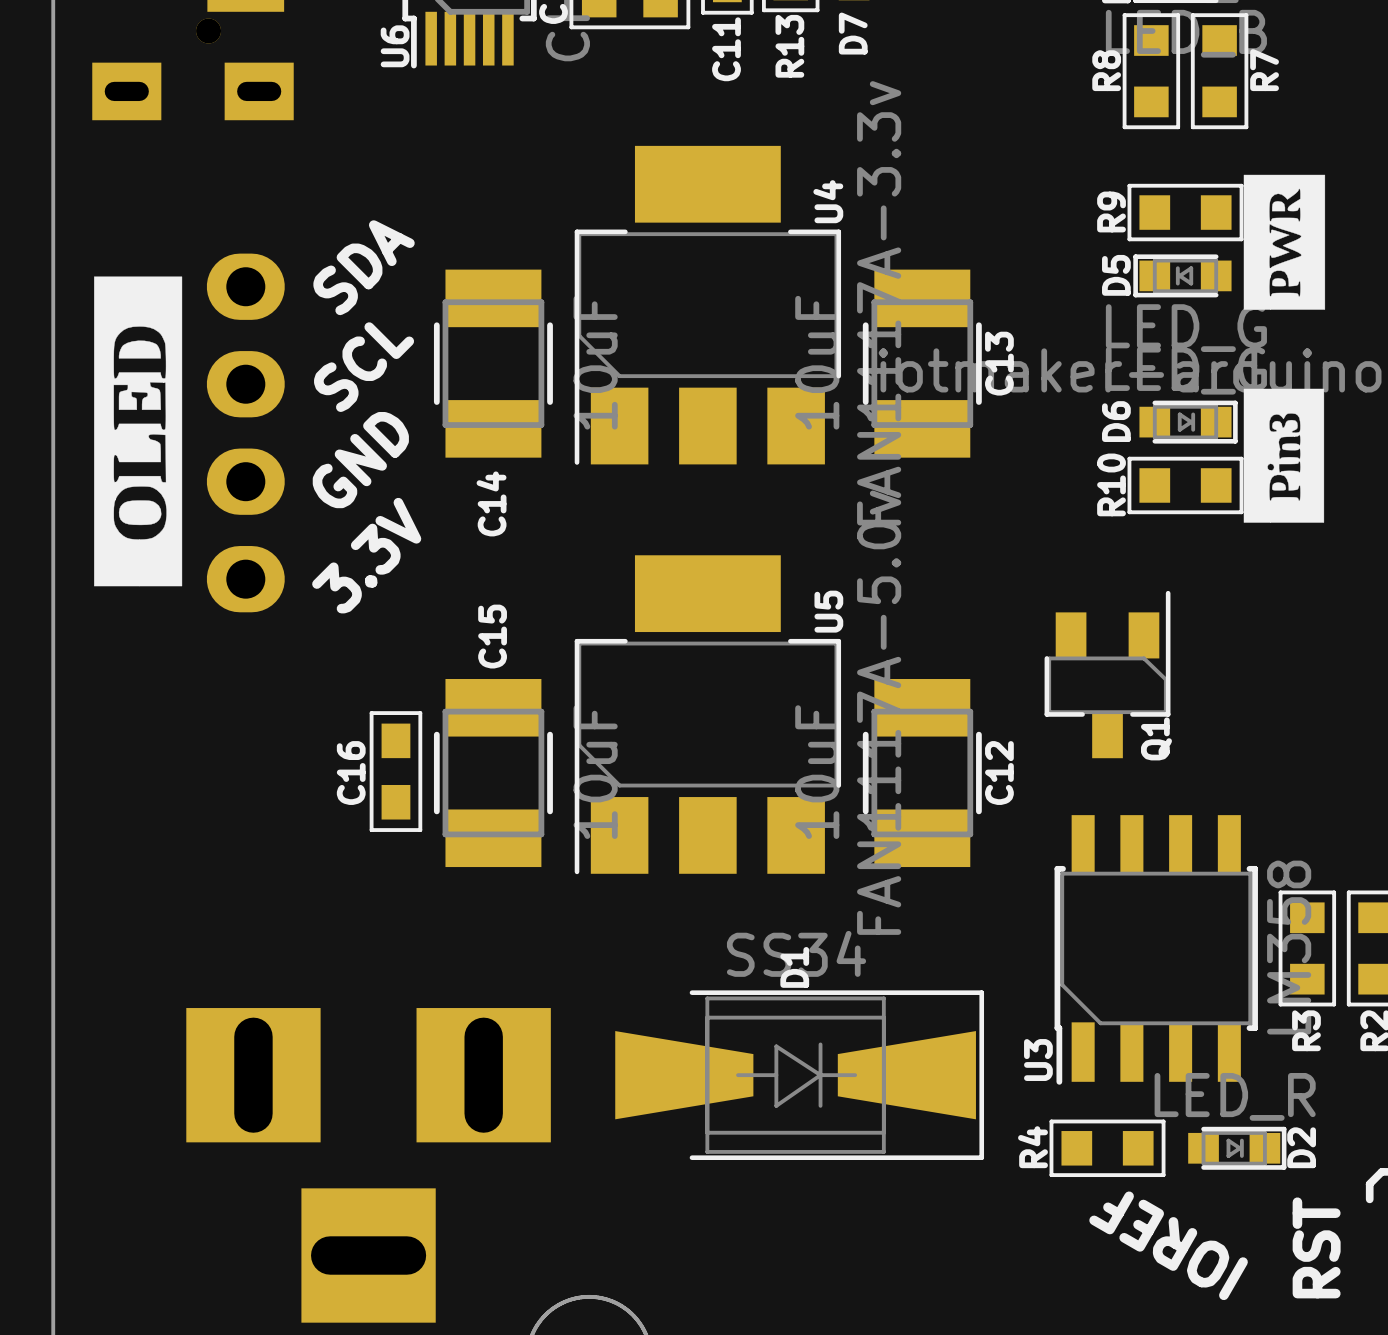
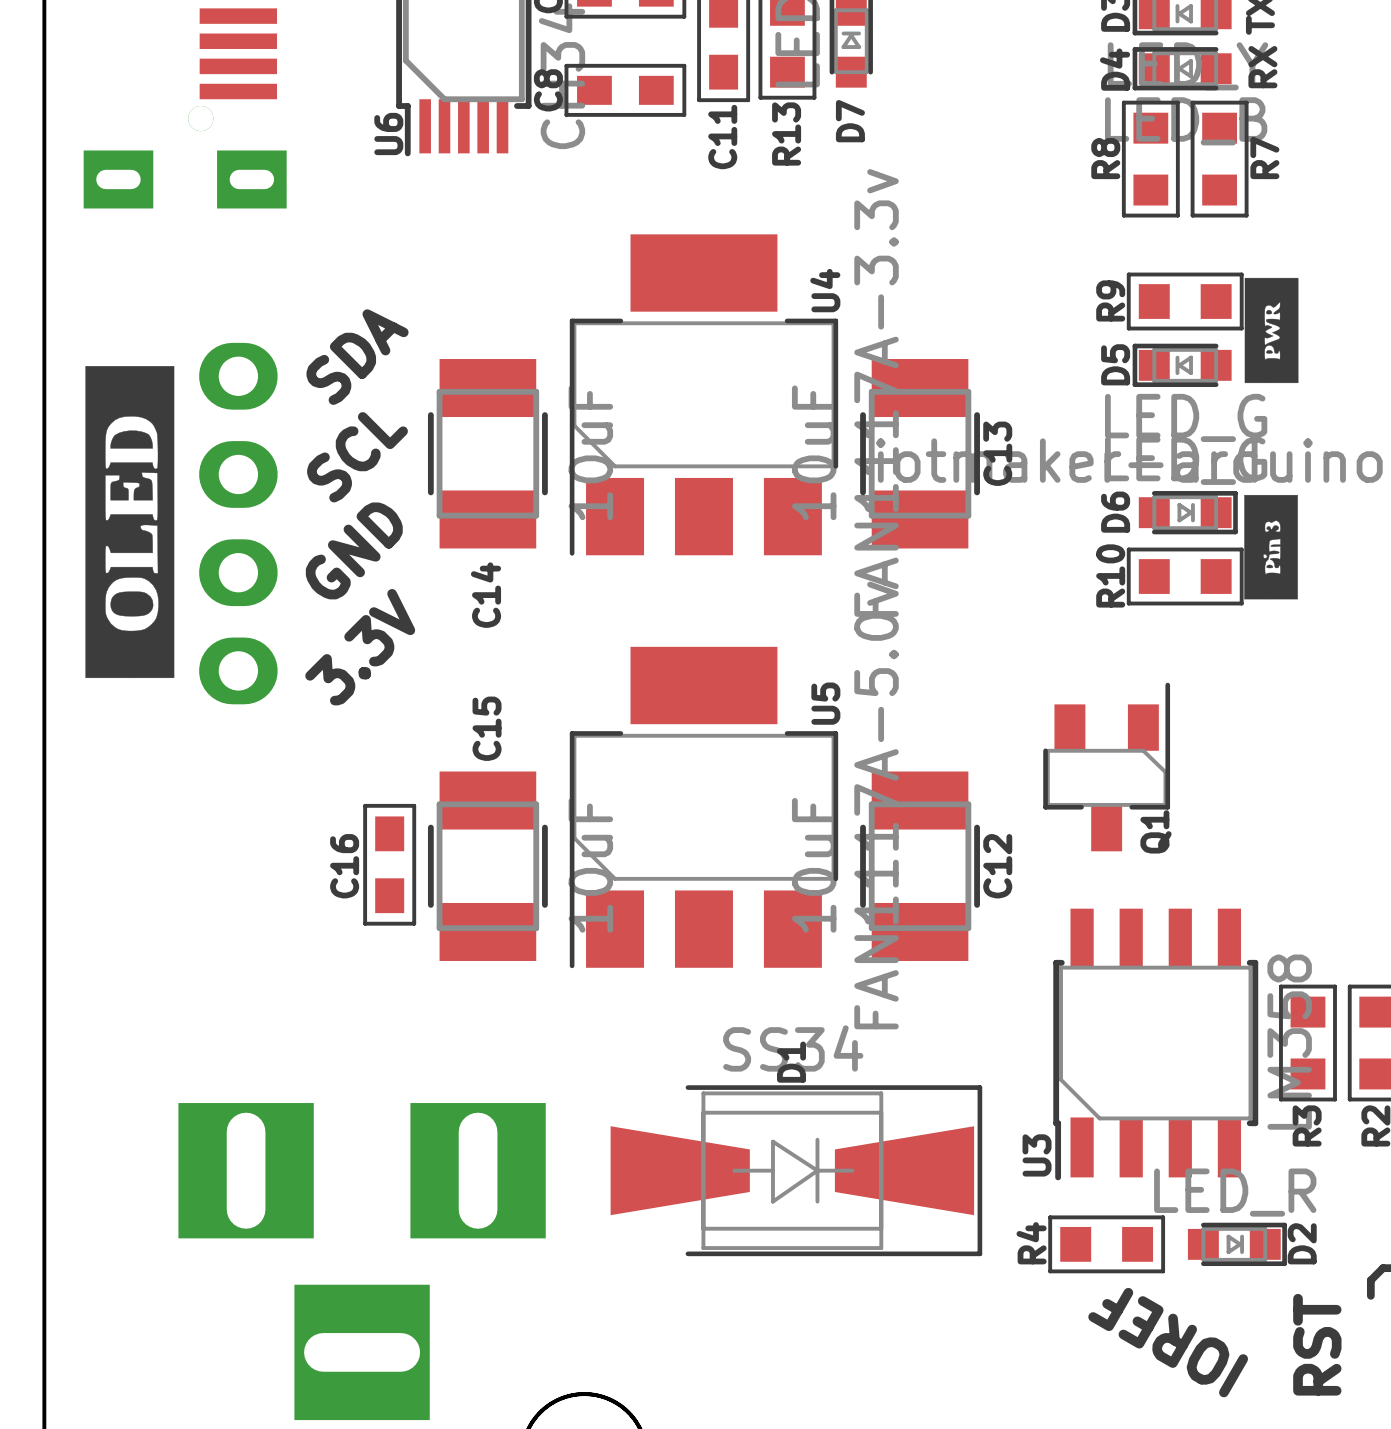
drawing shape: [1243, 174, 1326, 310] -> [1244, 277, 1299, 384]
drawing shape: [1243, 388, 1325, 523] -> [1244, 494, 1298, 600]

